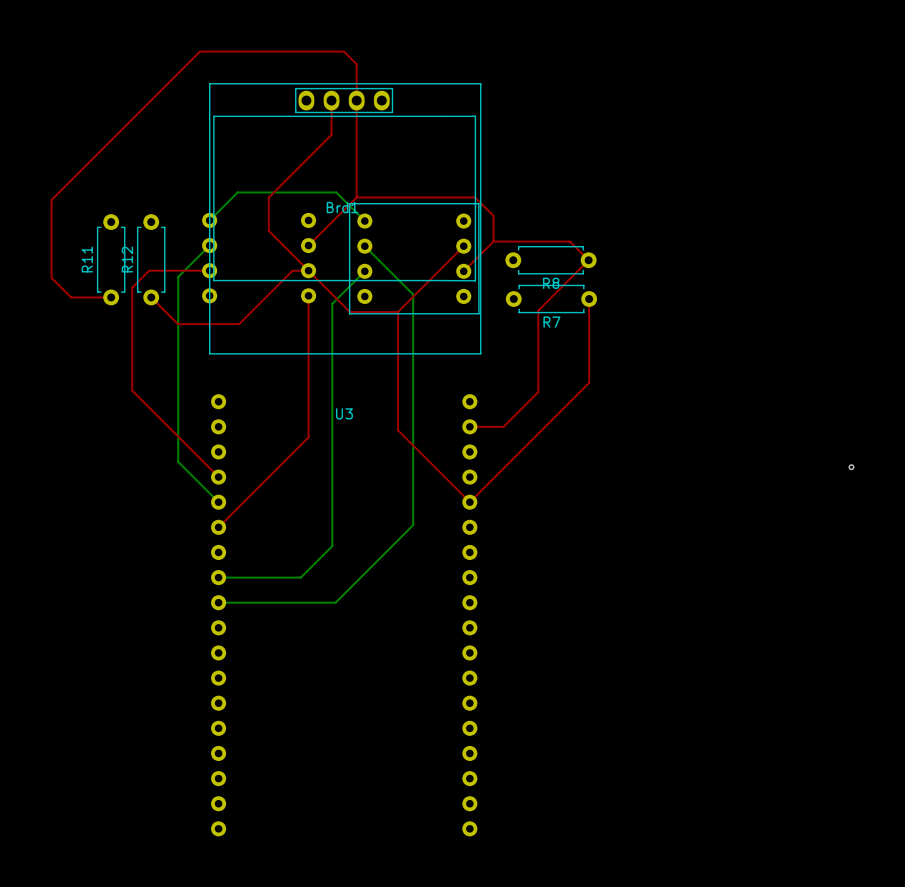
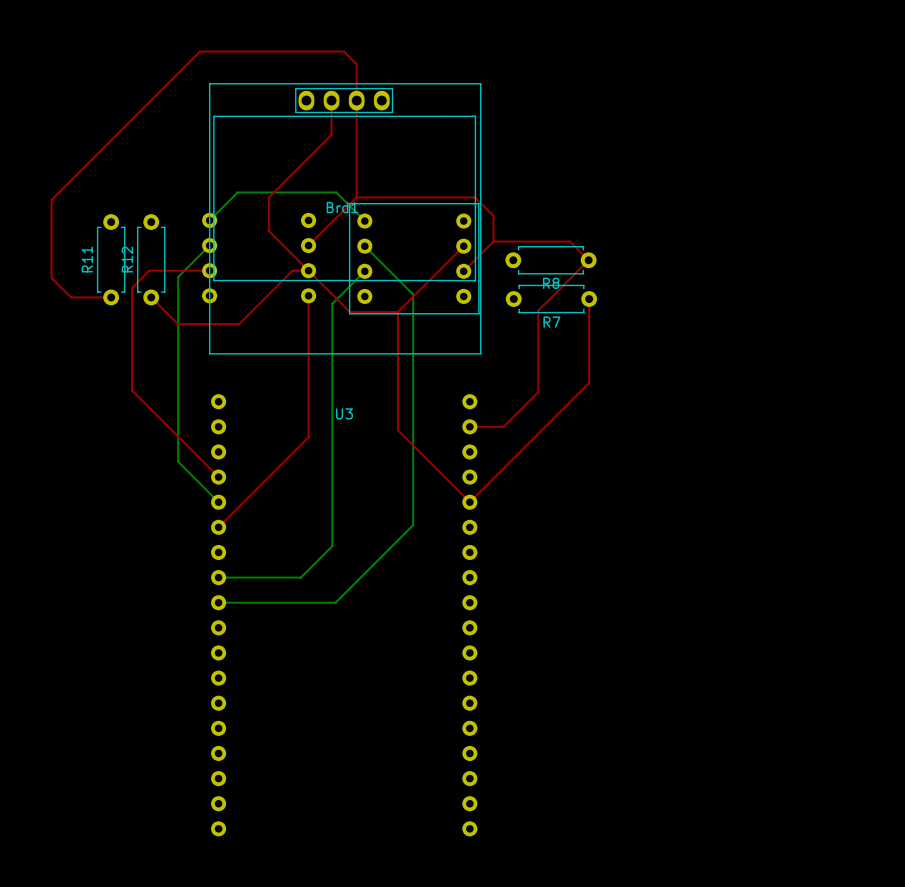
via: (851, 467) -> none

